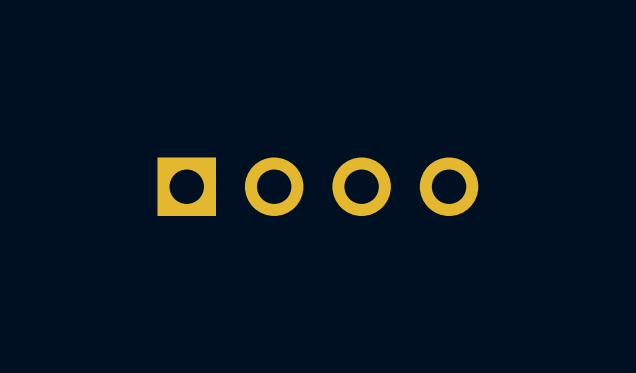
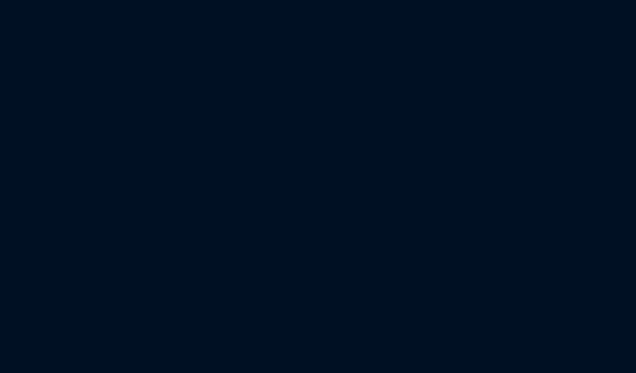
part: (317, 186) -> none

